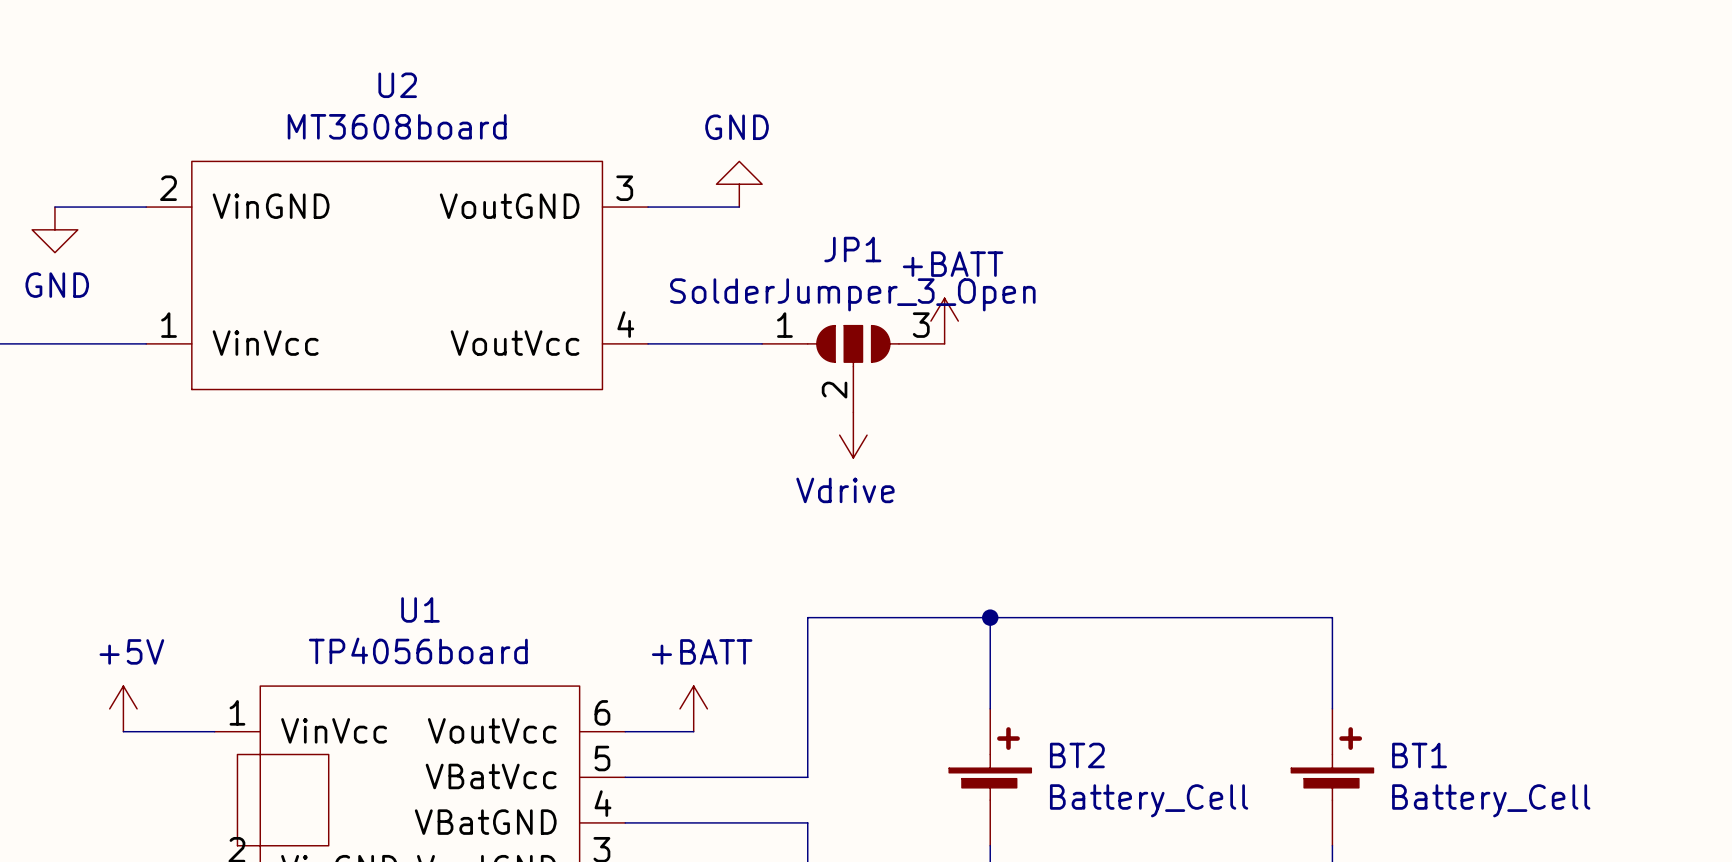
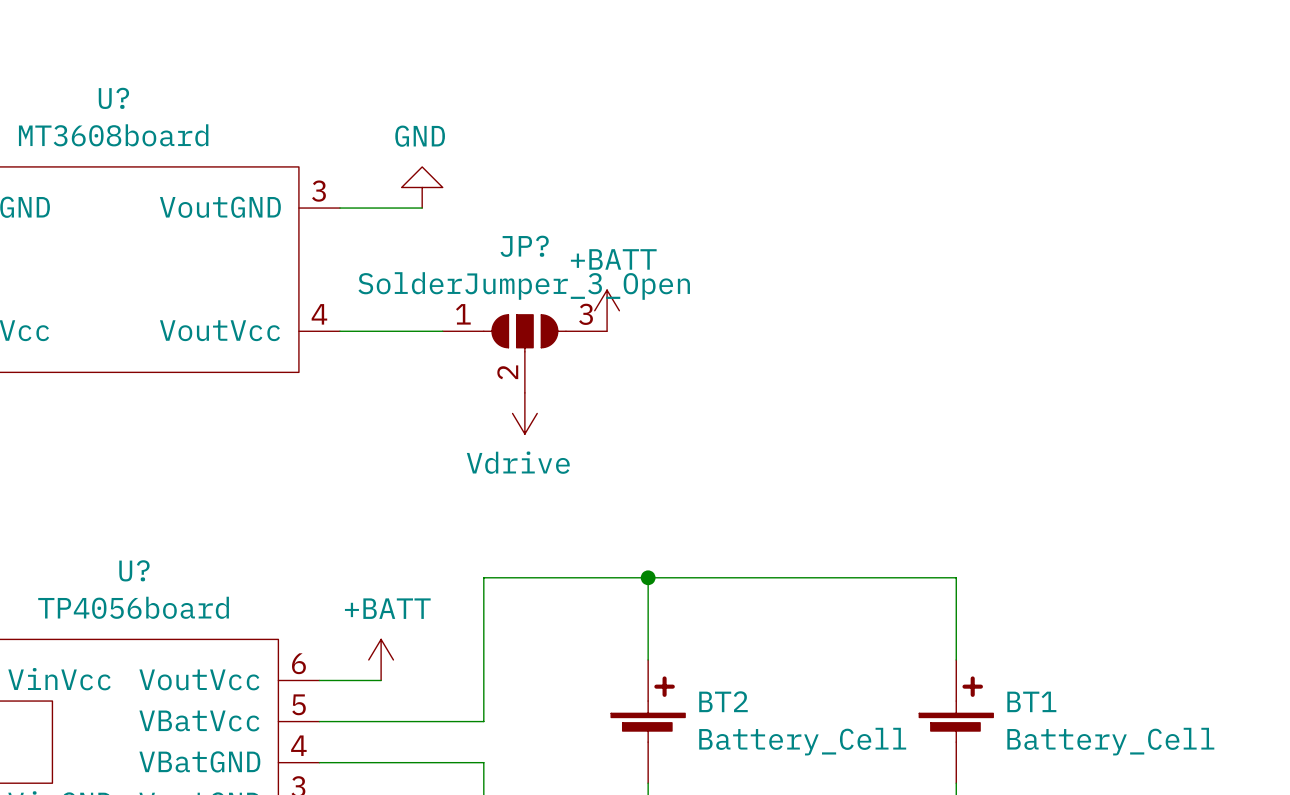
U2 name: U2 (397, 85) -> U? (113, 98)
JP1 name: JP1 (852, 249) -> JP? (524, 246)
U1 name: U1 (420, 609) -> U? (134, 570)

